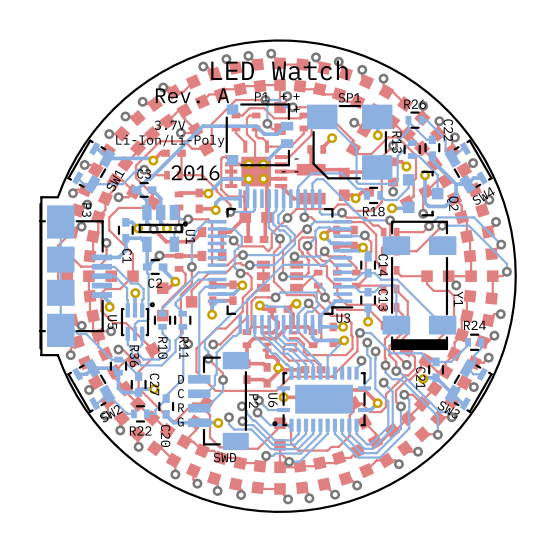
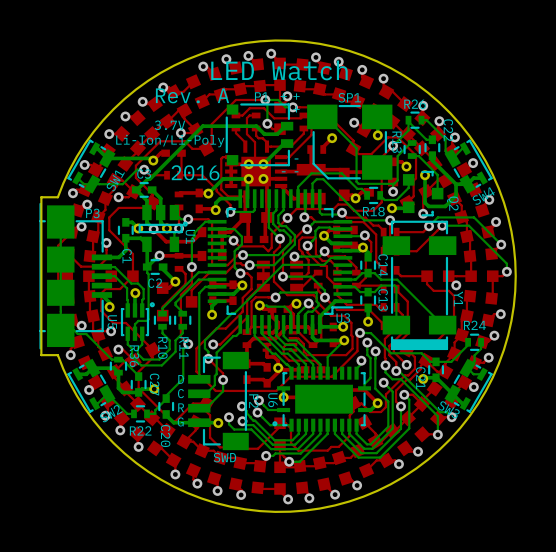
P3 name rotation: 0° (86, 210) -> 90° counterclockwise (92, 213)

